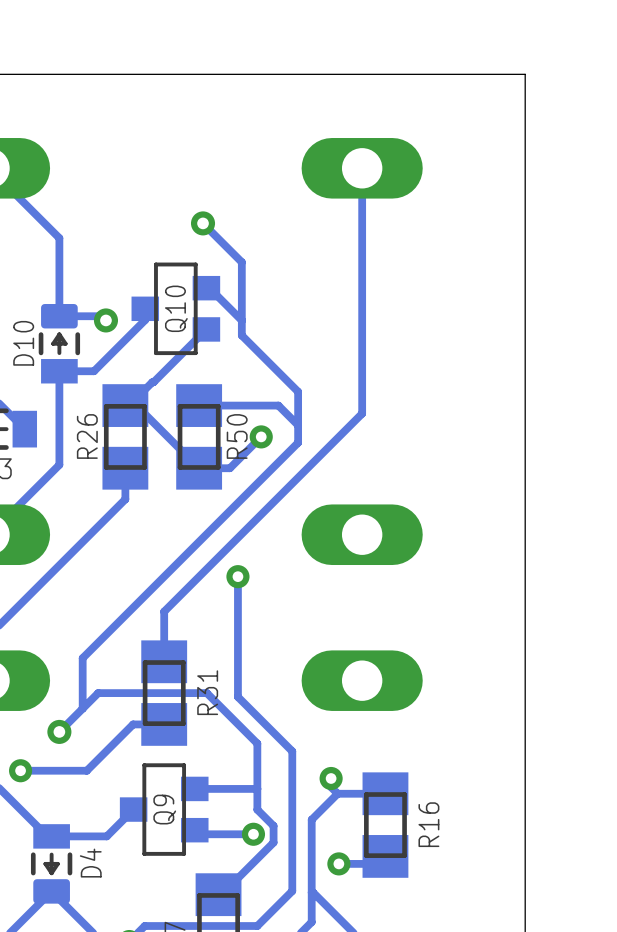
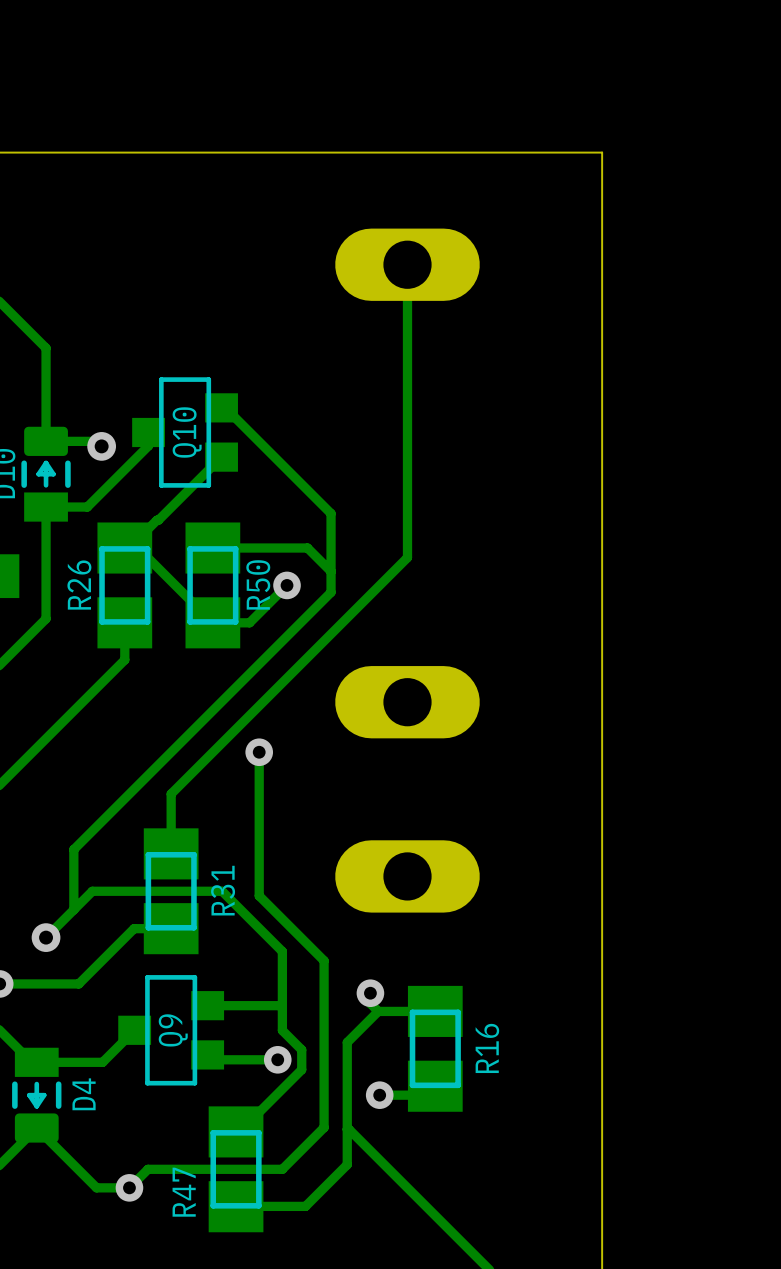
track: (203, 223) (241, 262) (241, 335) (298, 391) -> (263, 446) (331, 513) (331, 531)
via: (203, 223) -> none

